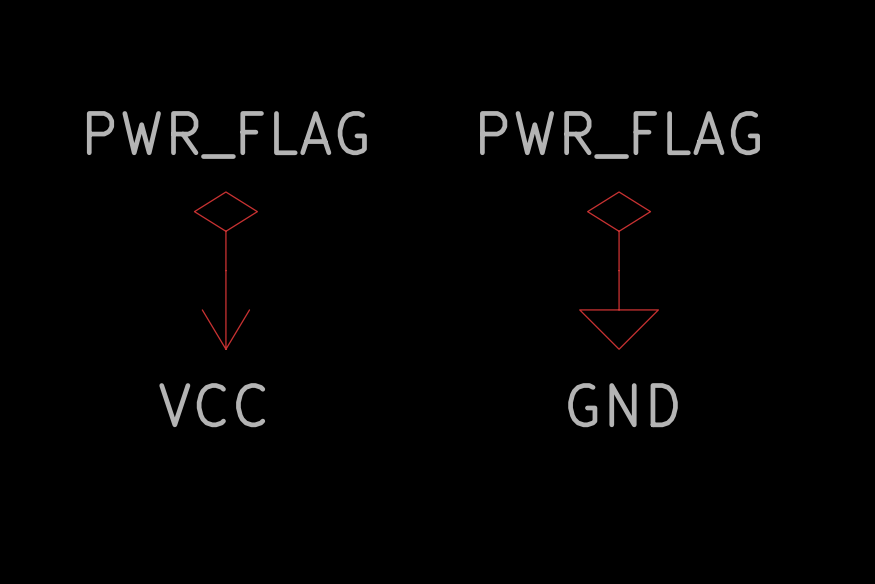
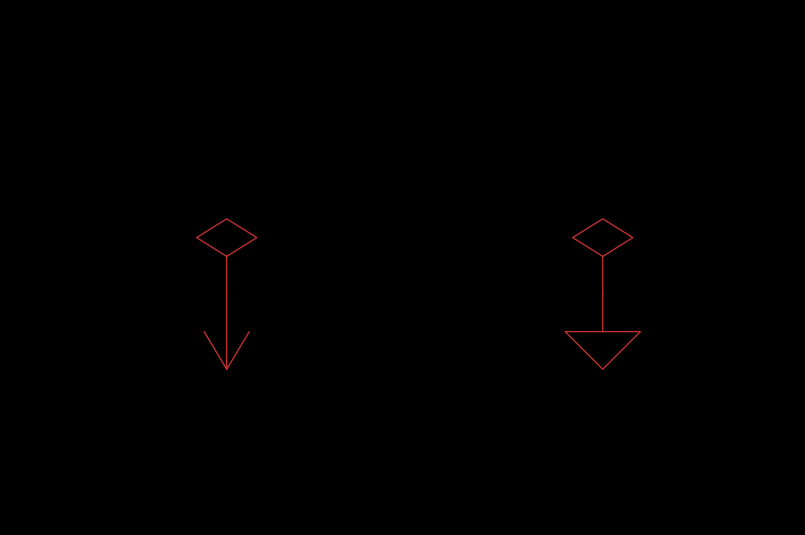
power symbol text: PWR_FLAG (226, 134) -> none
power symbol text: PWR_FLAG (620, 134) -> none
power symbol text: VCC (212, 405) -> none
power symbol text: GND (623, 405) -> none

